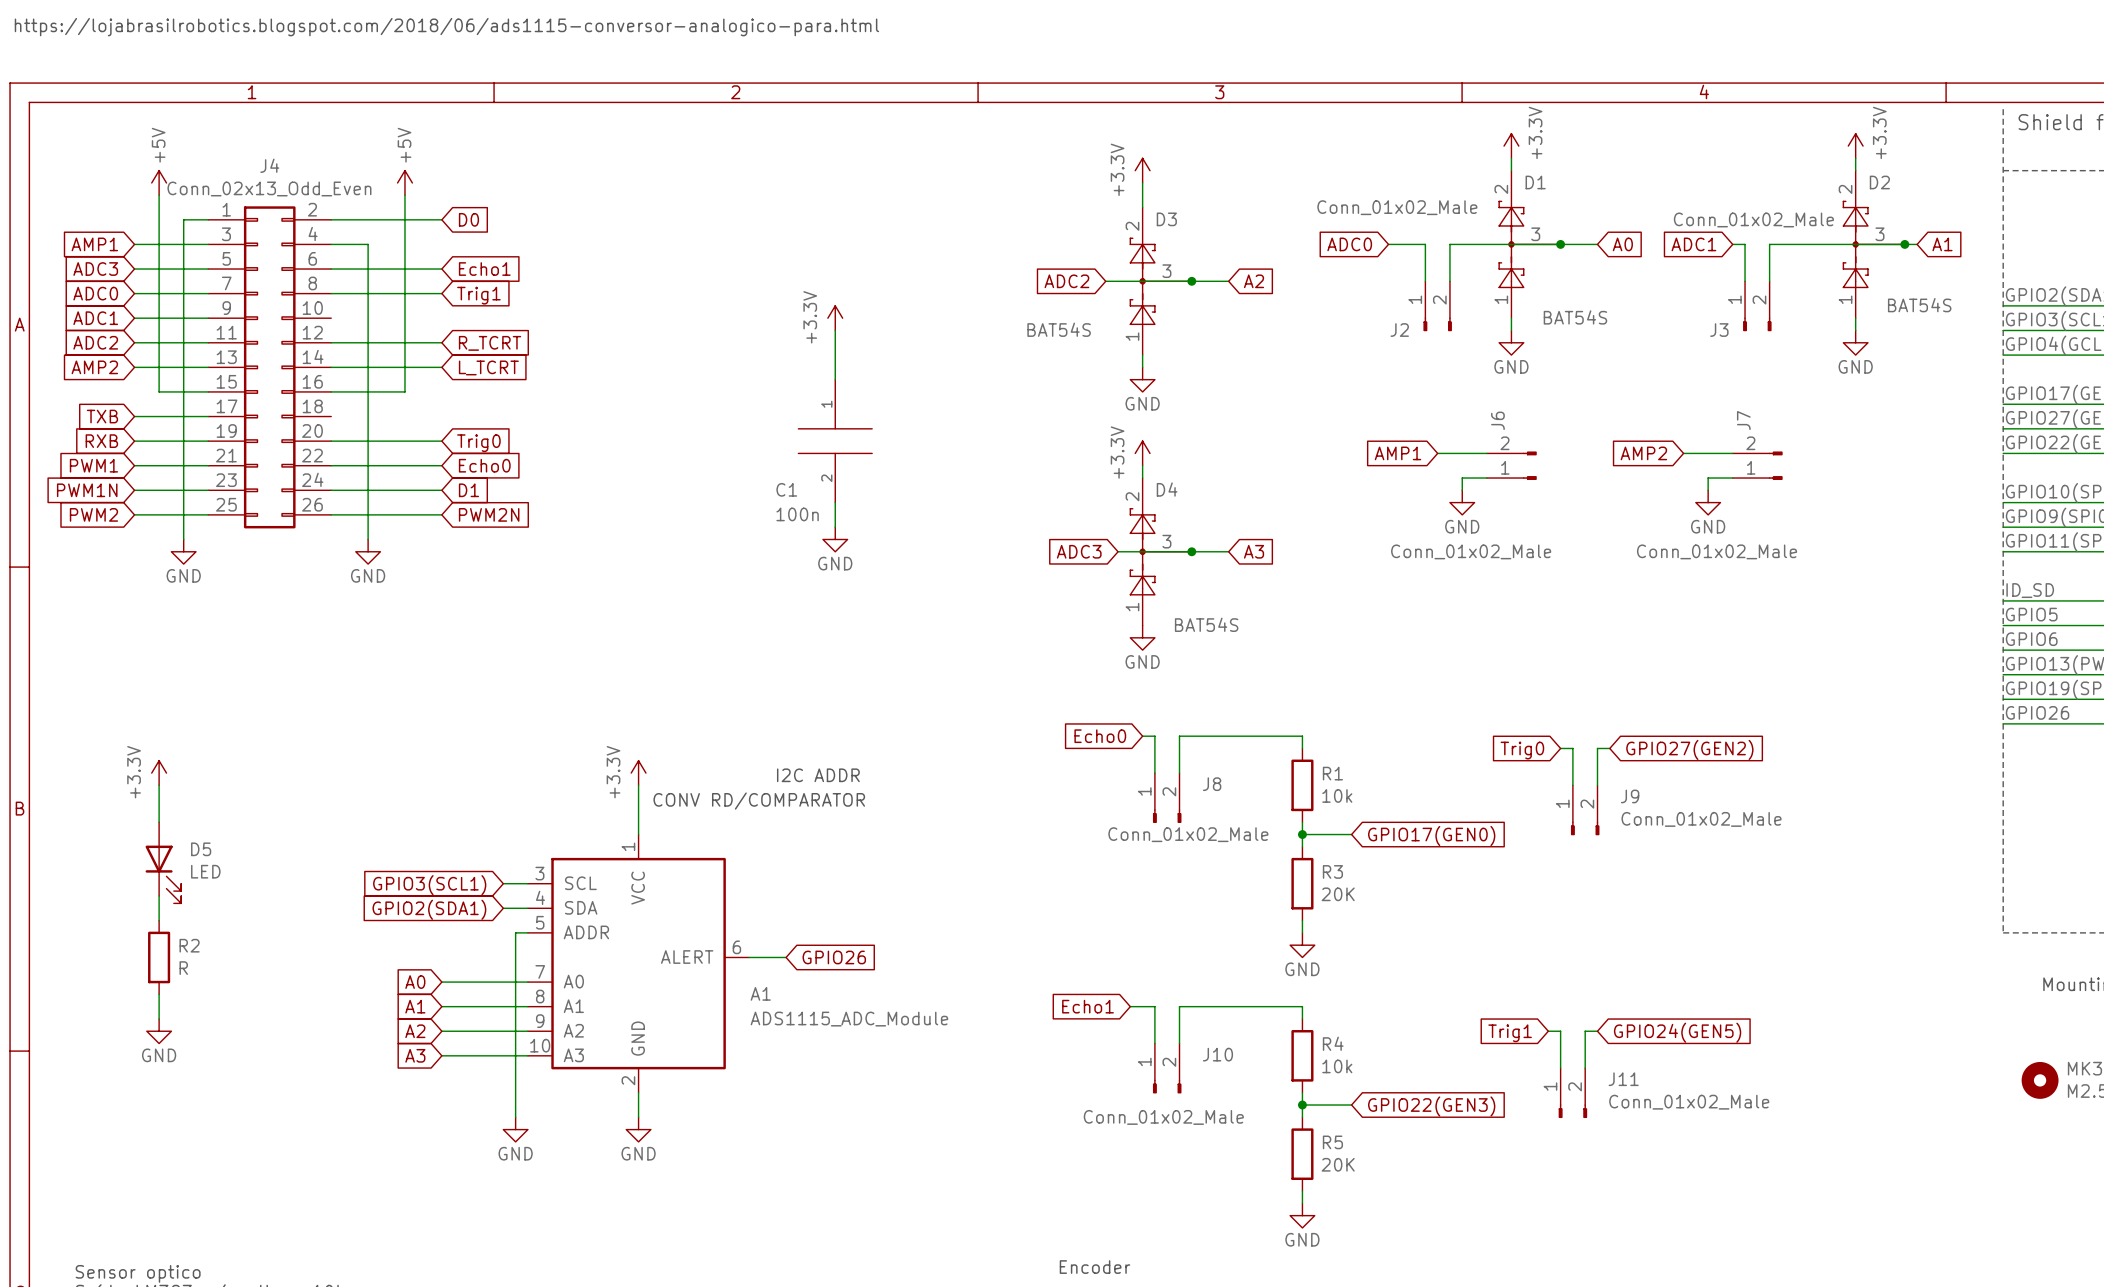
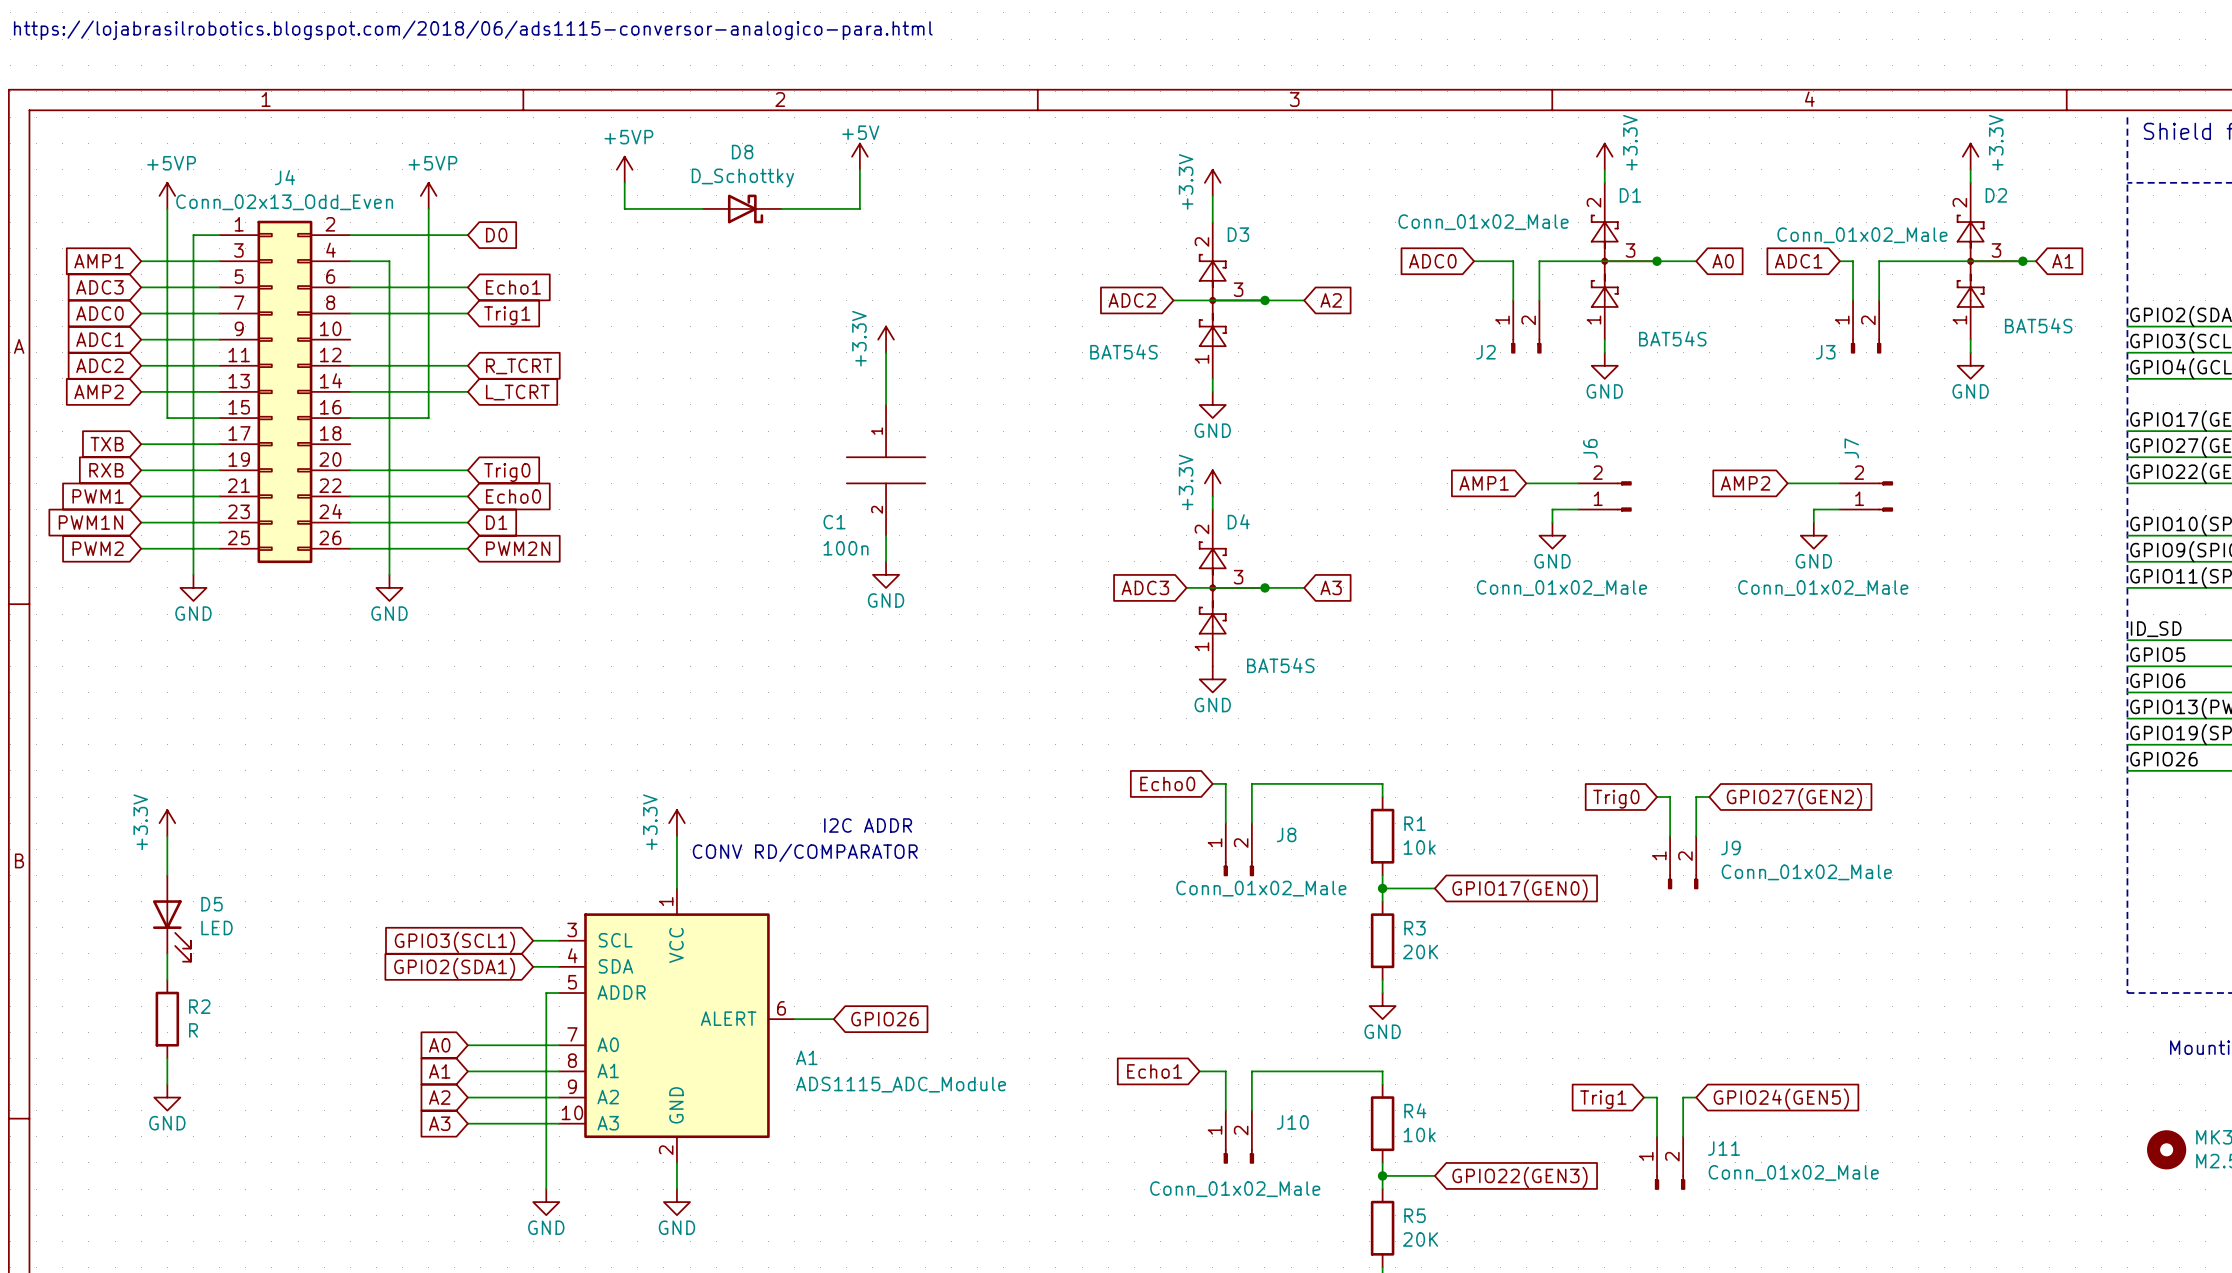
power symbol: none -> +5V (859, 156)
power symbol: none -> +5VP (624, 169)
wire: none -> (859, 169) (859, 208) (781, 208)
wire: none -> (624, 182) (624, 208) (703, 208)
power symbol: +5V (159, 182) -> +5VP (167, 195)
power symbol: +5V (404, 182) -> +5VP (428, 195)
D8: none -> D_Schottky (742, 208)

